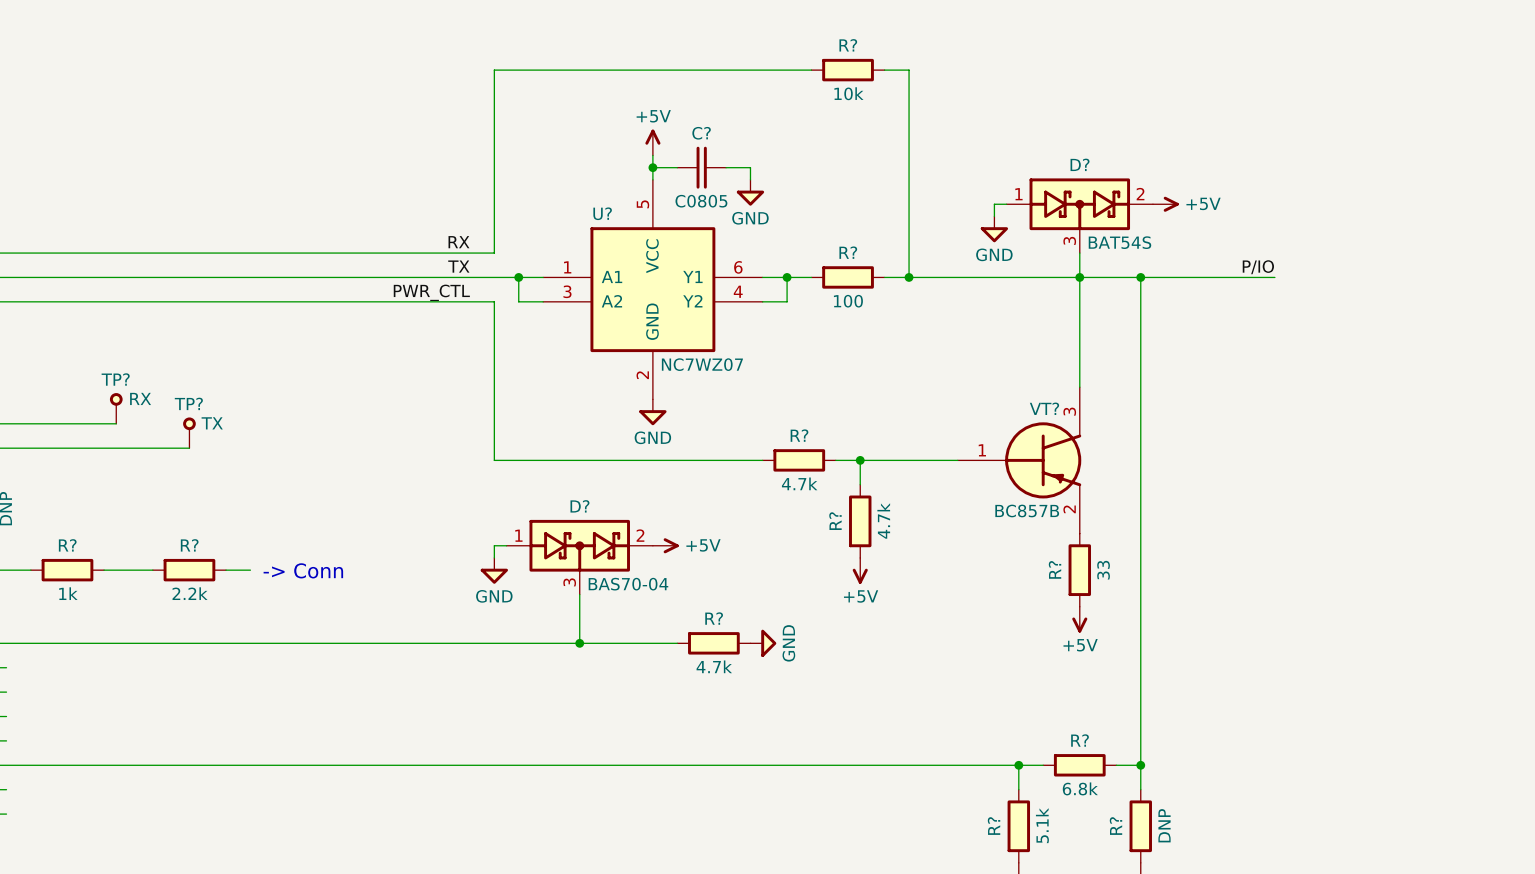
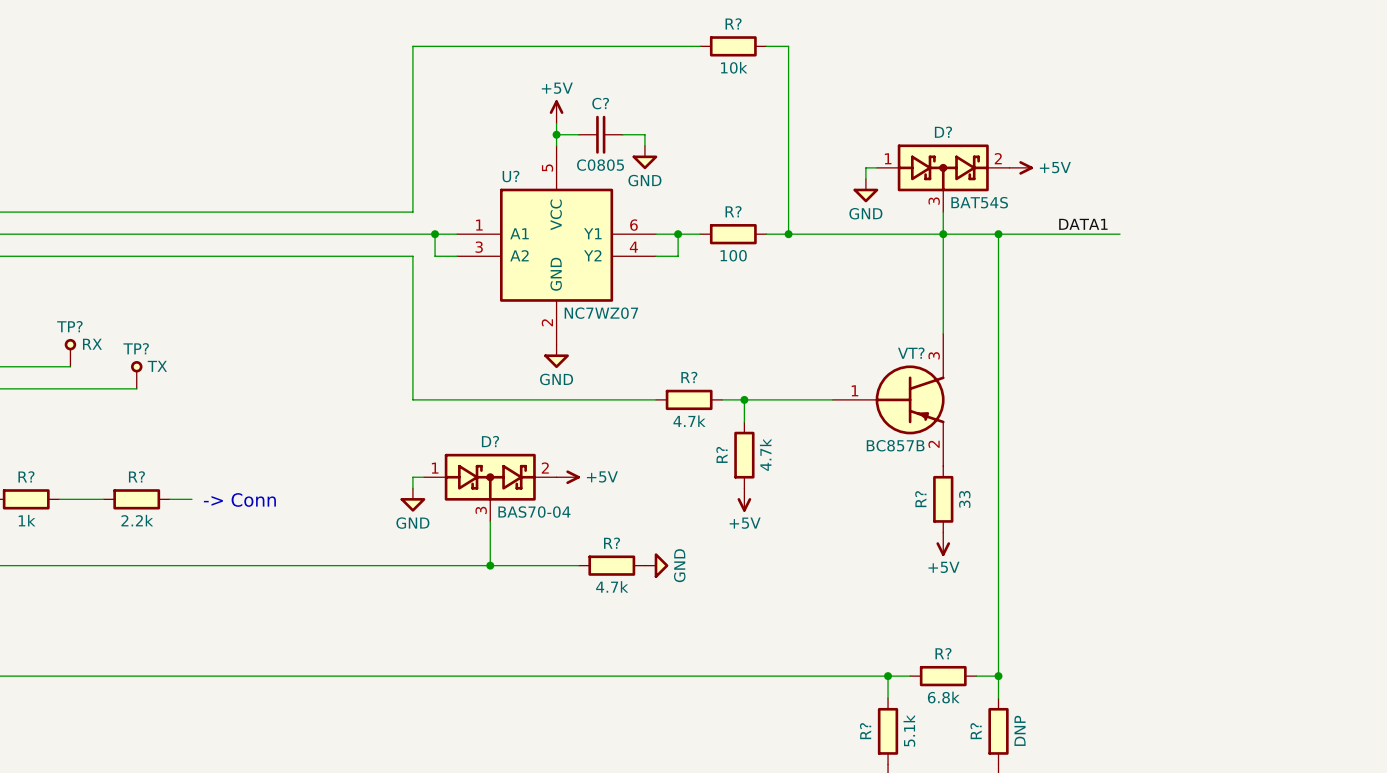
label: RX (458, 242) -> none
label: TX (458, 266) -> none
label: none -> DATA1 (1083, 224)
label: P/IO (1258, 267) -> none
label: PWR_CTL (431, 292) -> none

